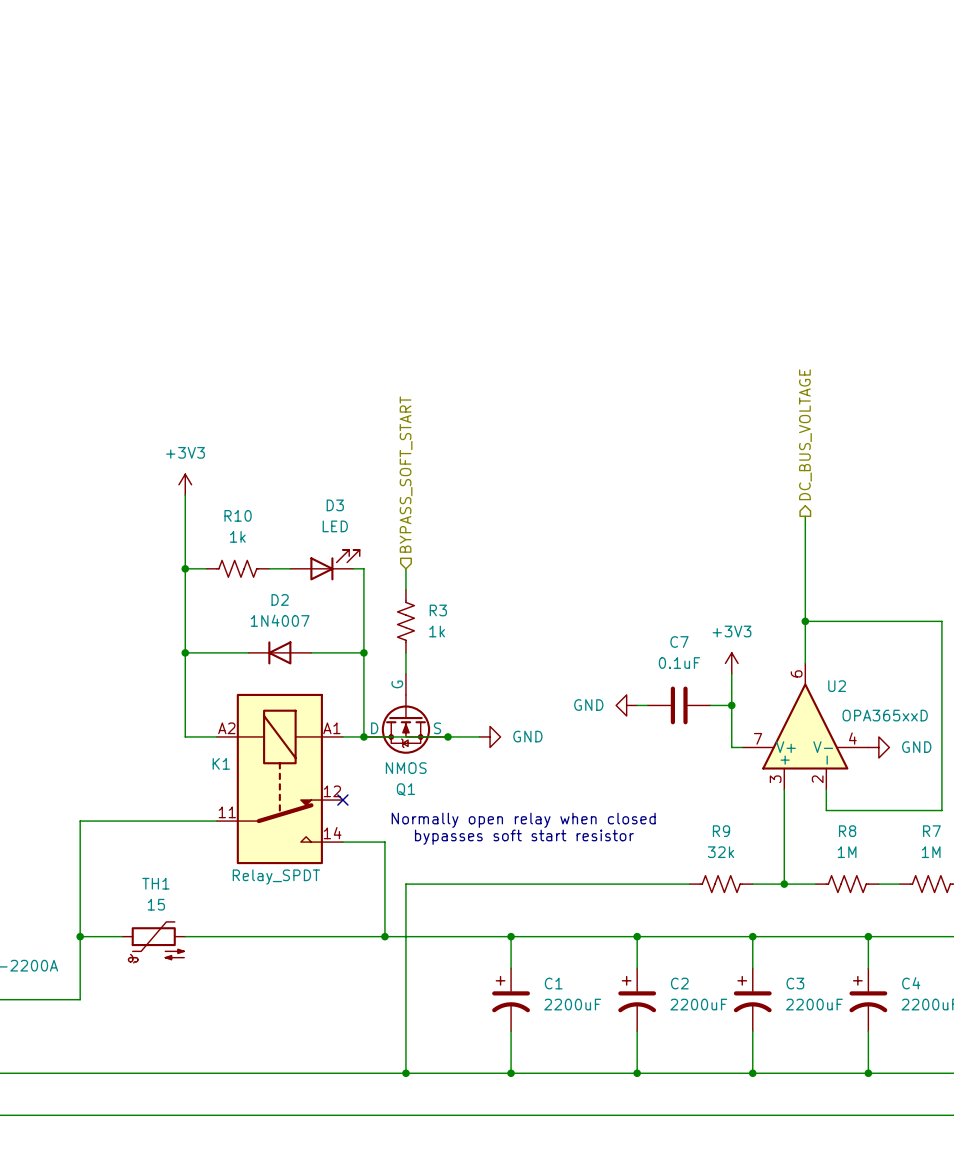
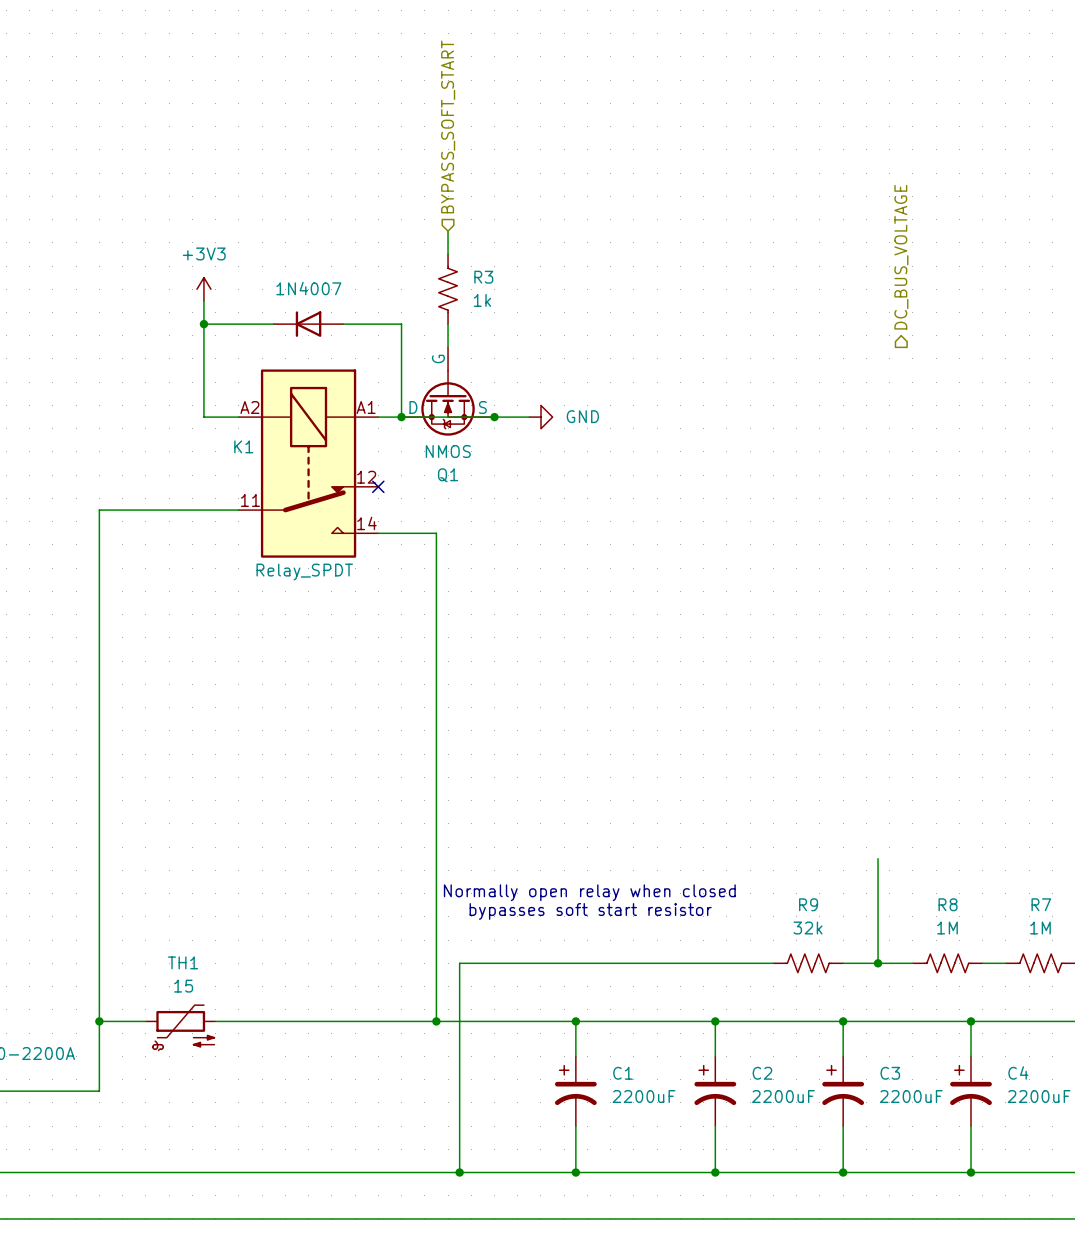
hierarchical label: none -> BYPASS_SOFT_START (448, 126)
wire: none -> (448, 231) (448, 254)
power symbol: none -> +3V3 (203, 289)
wire: none -> (203, 300) (203, 417) (238, 417)
wire: none -> (203, 324) (273, 324)
junction: none -> (203, 324)
part: none -> 1N4007 (308, 324)
wire: none -> (343, 324) (401, 324) (401, 417)
wire: none -> (448, 324) (448, 347)
wire: none -> (378, 417) (529, 417)
junction: none -> (401, 417)
junction: none -> (494, 417)
power symbol: none -> GND (540, 417)
hierarchical label position: DC_BUS_VOLTAGE (805, 434) -> DC_BUS_VOLTAGE (901, 257)
no-connect mark: none -> (378, 486)
hierarchical label: BYPASS_SOFT_START (406, 474) -> none
power symbol: +3V3 (185, 484) -> none
wire: (185, 495) (185, 736) (216, 736) -> none
wire: (805, 516) (805, 663) -> none
D3: LED (325, 565) -> none
wire: (185, 568) (206, 568) -> none
junction: (185, 568) -> none
R10: 1k (237, 568) -> none
wire: (269, 568) (290, 568) -> none
wire: (353, 568) (363, 568) (363, 736) -> none
wire: (405, 568) (405, 589) -> none
R3 position: (405, 621) -> (448, 289)
wire: (805, 621) (941, 621) (941, 810) (826, 810) (826, 789) -> none
junction: (805, 621) -> none
wire: (185, 652) (248, 652) -> none
junction: (185, 652) -> none
D2: 1N4007 (279, 652) -> none
wire: (311, 652) (363, 652) -> none
junction: (363, 652) -> none
wire: (405, 652) (405, 673) -> none
power symbol: +3V3 (731, 663) -> none
wire: (731, 673) (731, 747) (742, 747) -> none
power symbol: GND (626, 705) -> none
wire: (637, 705) (647, 705) -> none
C7: 0.1uF (679, 705) -> none
wire: (710, 705) (731, 705) -> none
junction: (731, 705) -> none
Q1 position: (405, 713) -> (448, 391)
U2: OPA365xxD (805, 726) -> none
wire: (342, 736) (479, 736) -> none
junction: (363, 736) -> none
junction: (448, 736) -> none
power symbol: GND (490, 736) -> none
power symbol: GND (878, 747) -> none
K1 position: (279, 779) -> (308, 463)
no-connect mark: (342, 800) -> none
wire: (80, 821) (216, 821) -> (99, 893) (99, 510) (238, 510)
wire: (342, 842) (384, 842) -> (378, 533) (436, 533) (436, 916)

